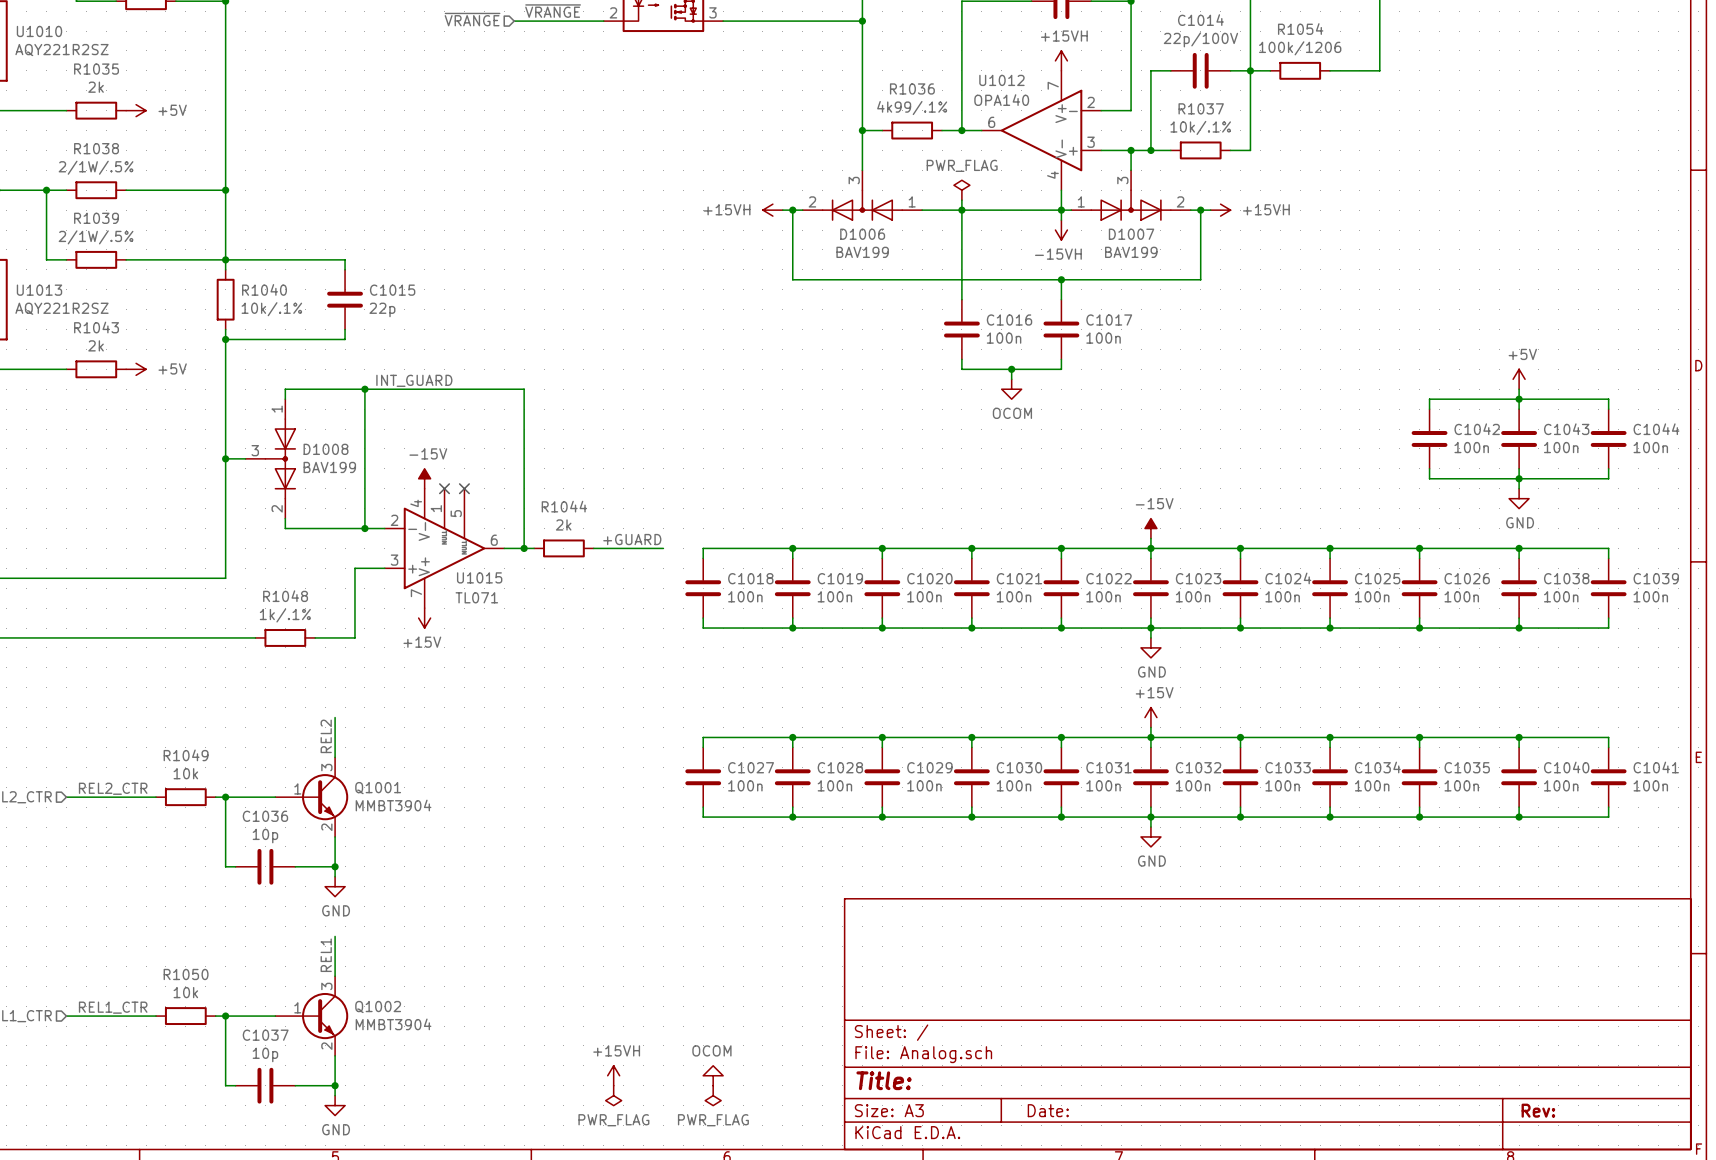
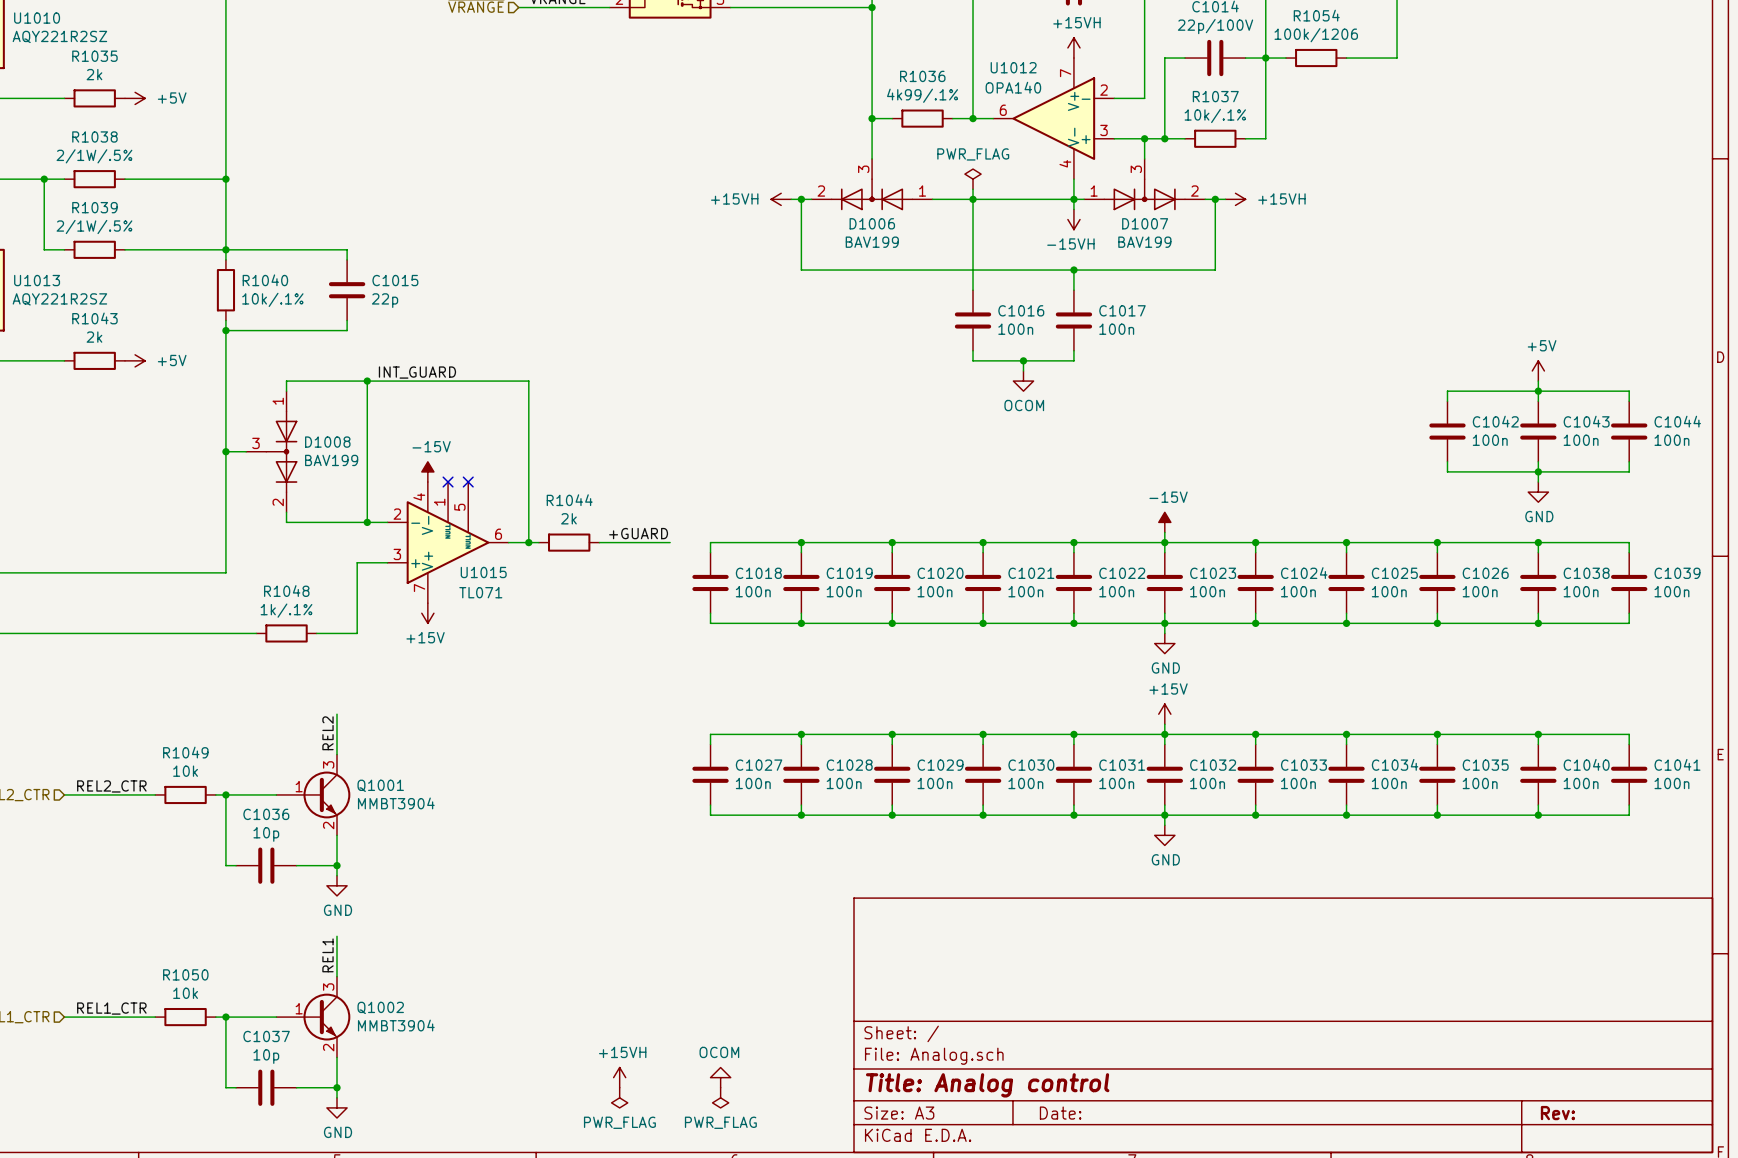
title block: Title: (884, 1080) -> Title: Analog control (987, 1085)

